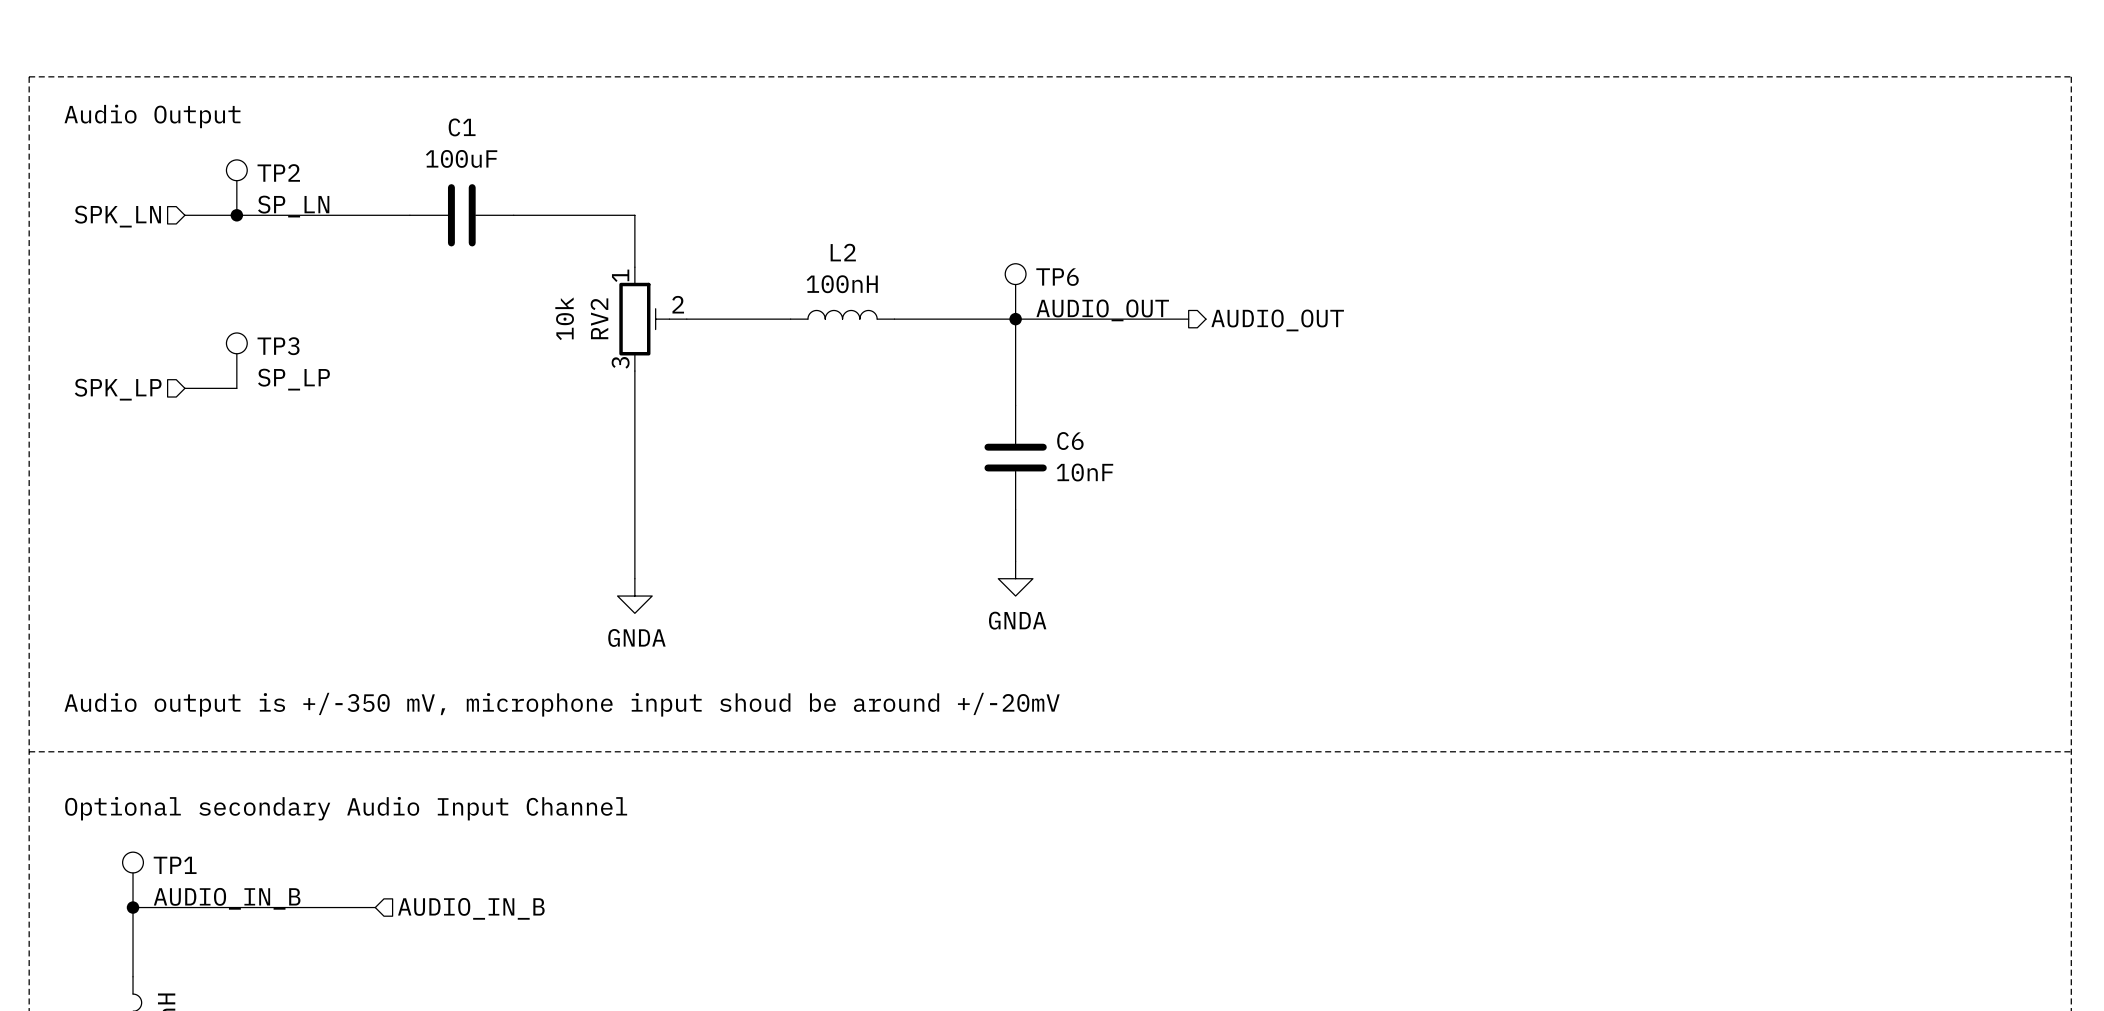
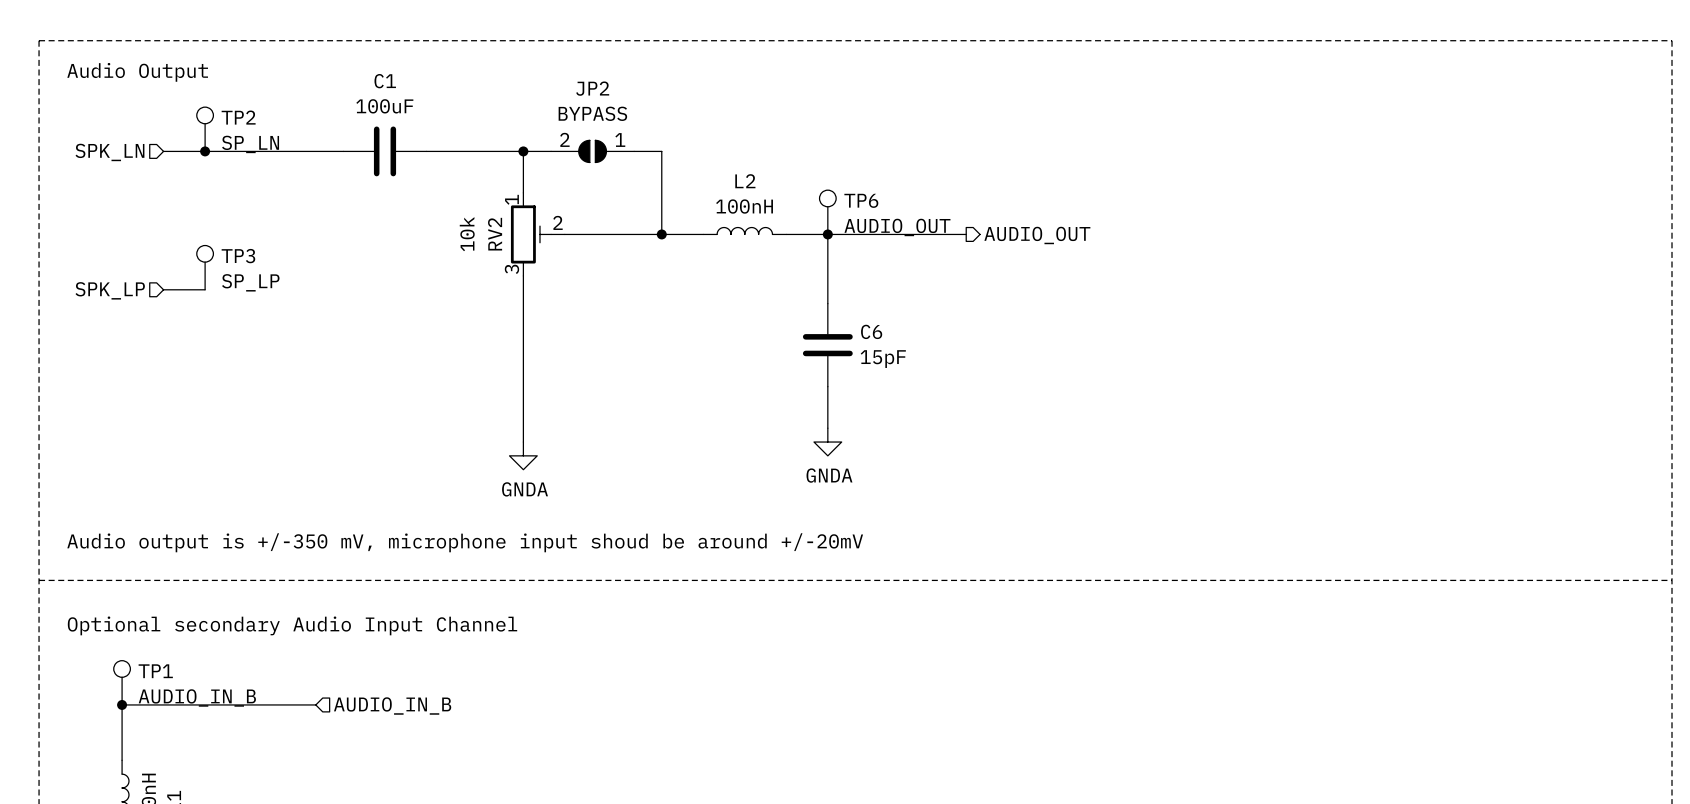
wire: none -> (523, 151) (551, 151)
junction: none -> (523, 151)
JP2: none -> BYPASS (592, 151)
wire: none -> (634, 151) (661, 151) (661, 234)
L2 position: (842, 314) -> (744, 230)
junction: none -> (661, 234)
wire: (894, 319) (963, 319) -> (647, 234) (703, 234)
C6 value: 10nF (1084, 472) -> 15pF (883, 359)

